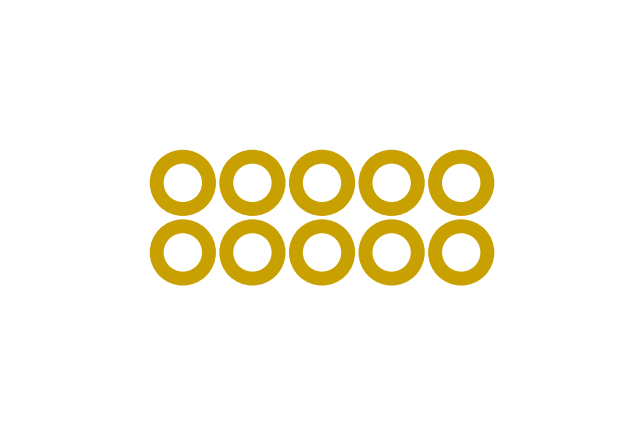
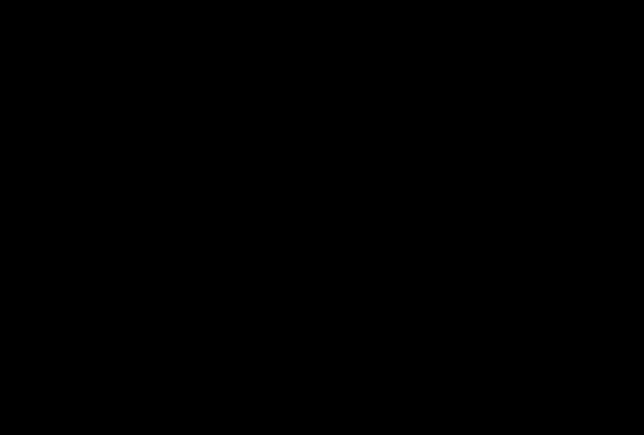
part: (322, 217) -> none

